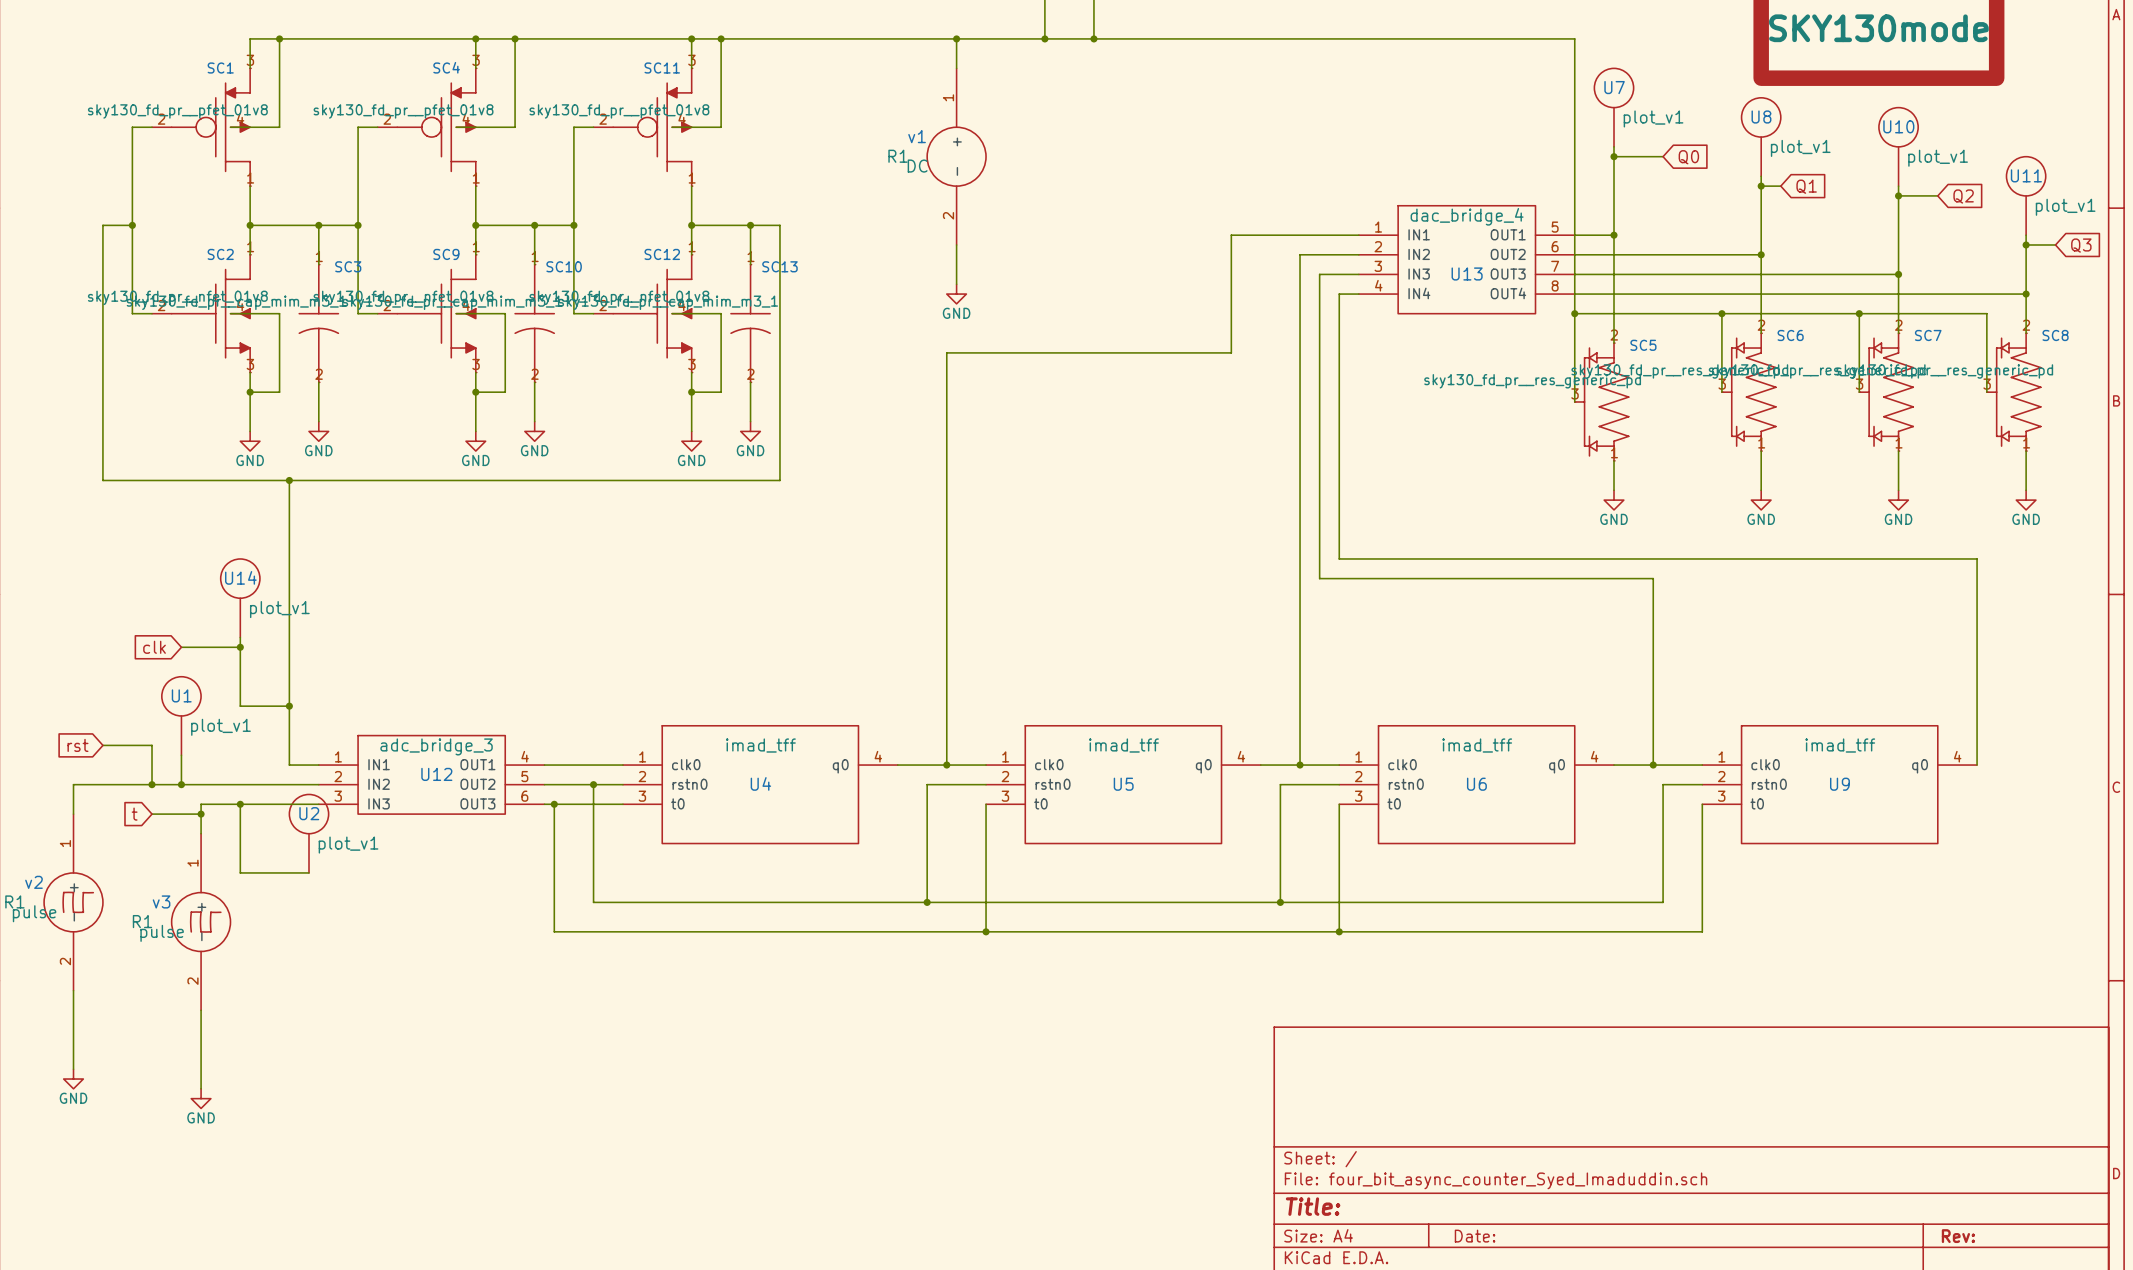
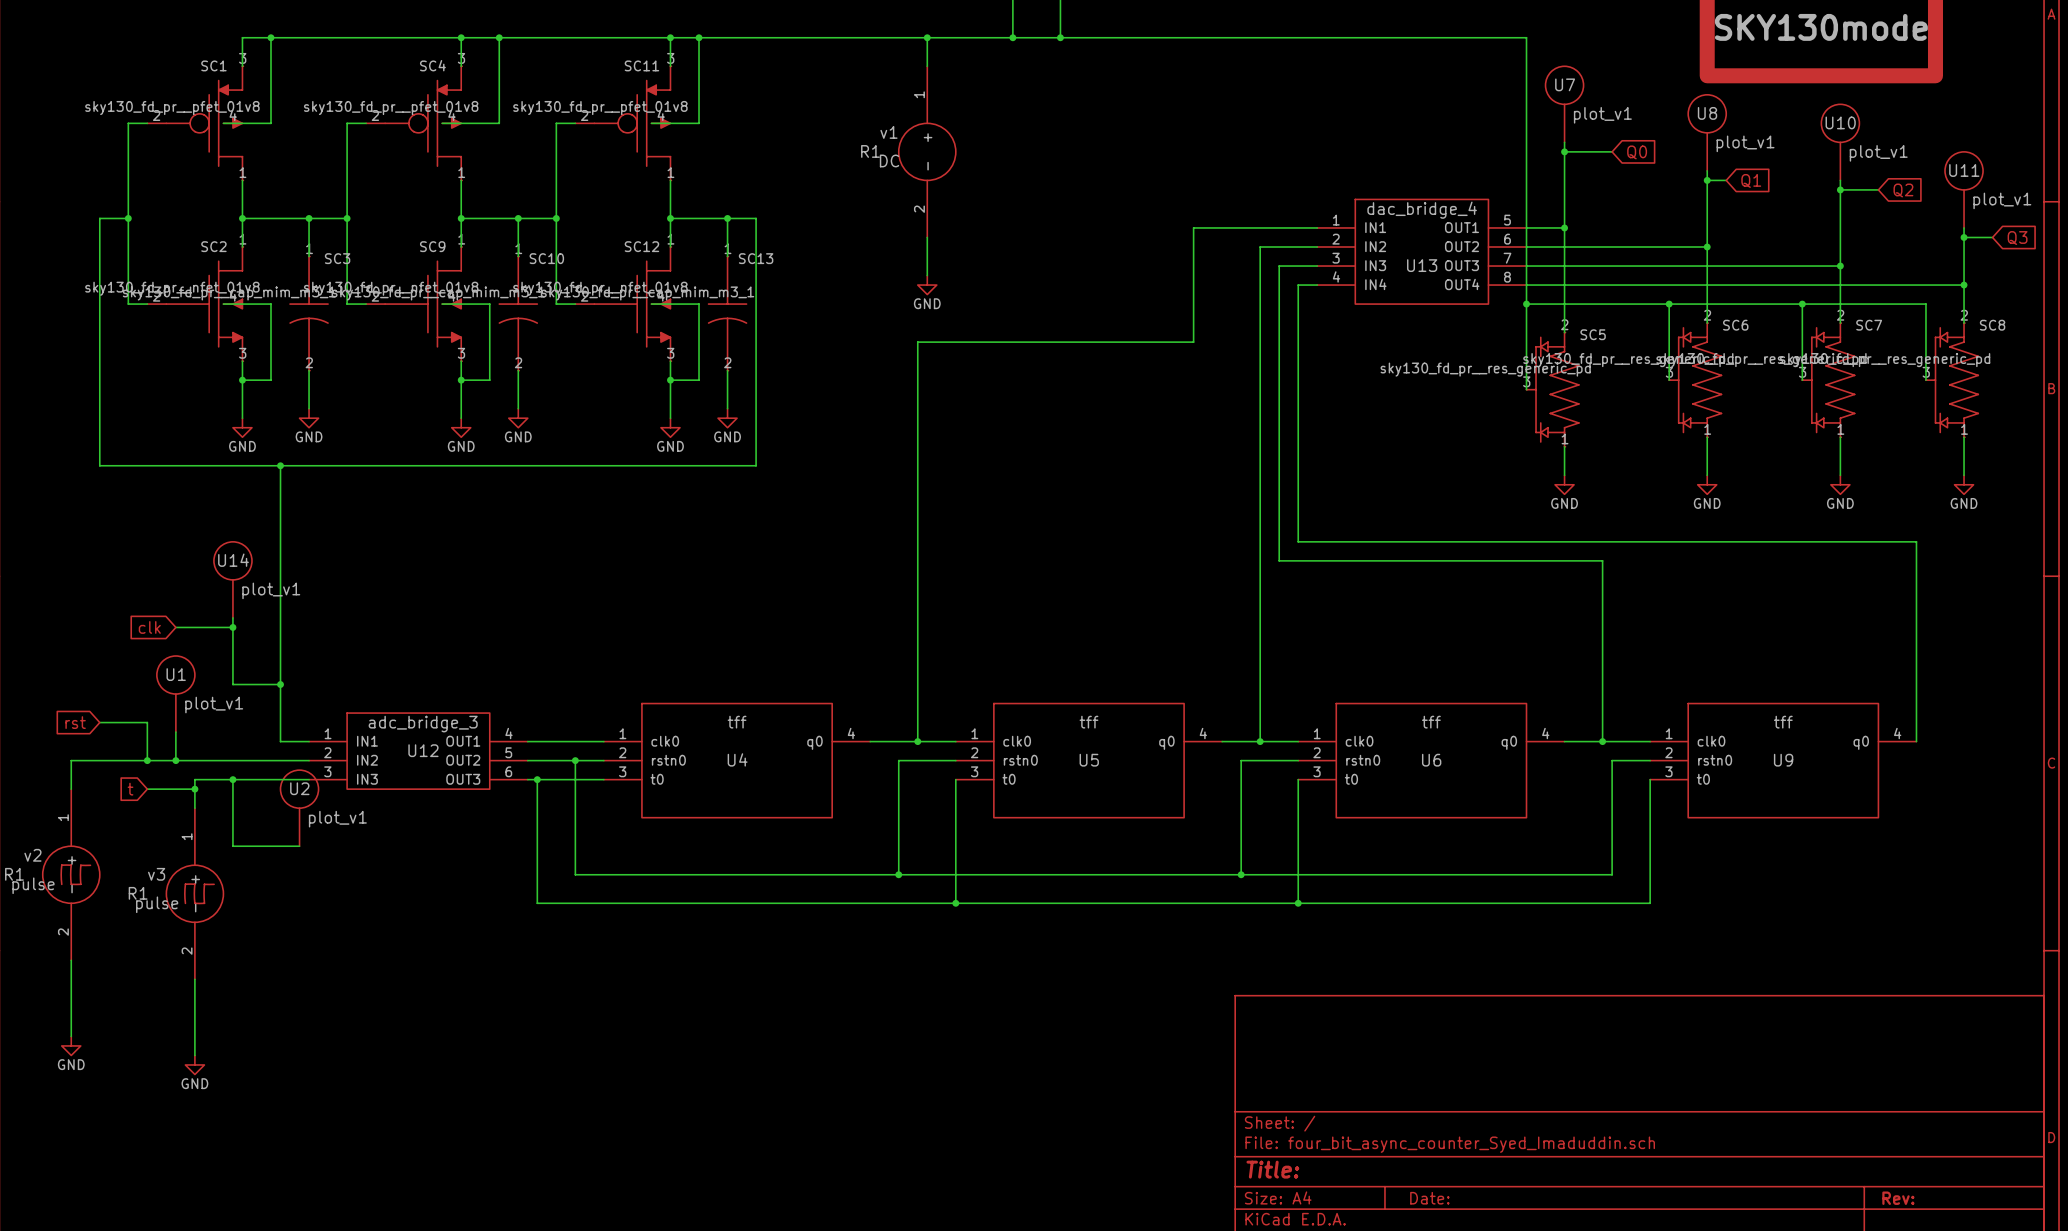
U4 value: imad_tff (760, 745) -> tff (737, 722)
U5 value: imad_tff (1123, 745) -> tff (1088, 722)
U6 value: imad_tff (1477, 745) -> tff (1431, 722)
U9 value: imad_tff (1840, 745) -> tff (1783, 722)

